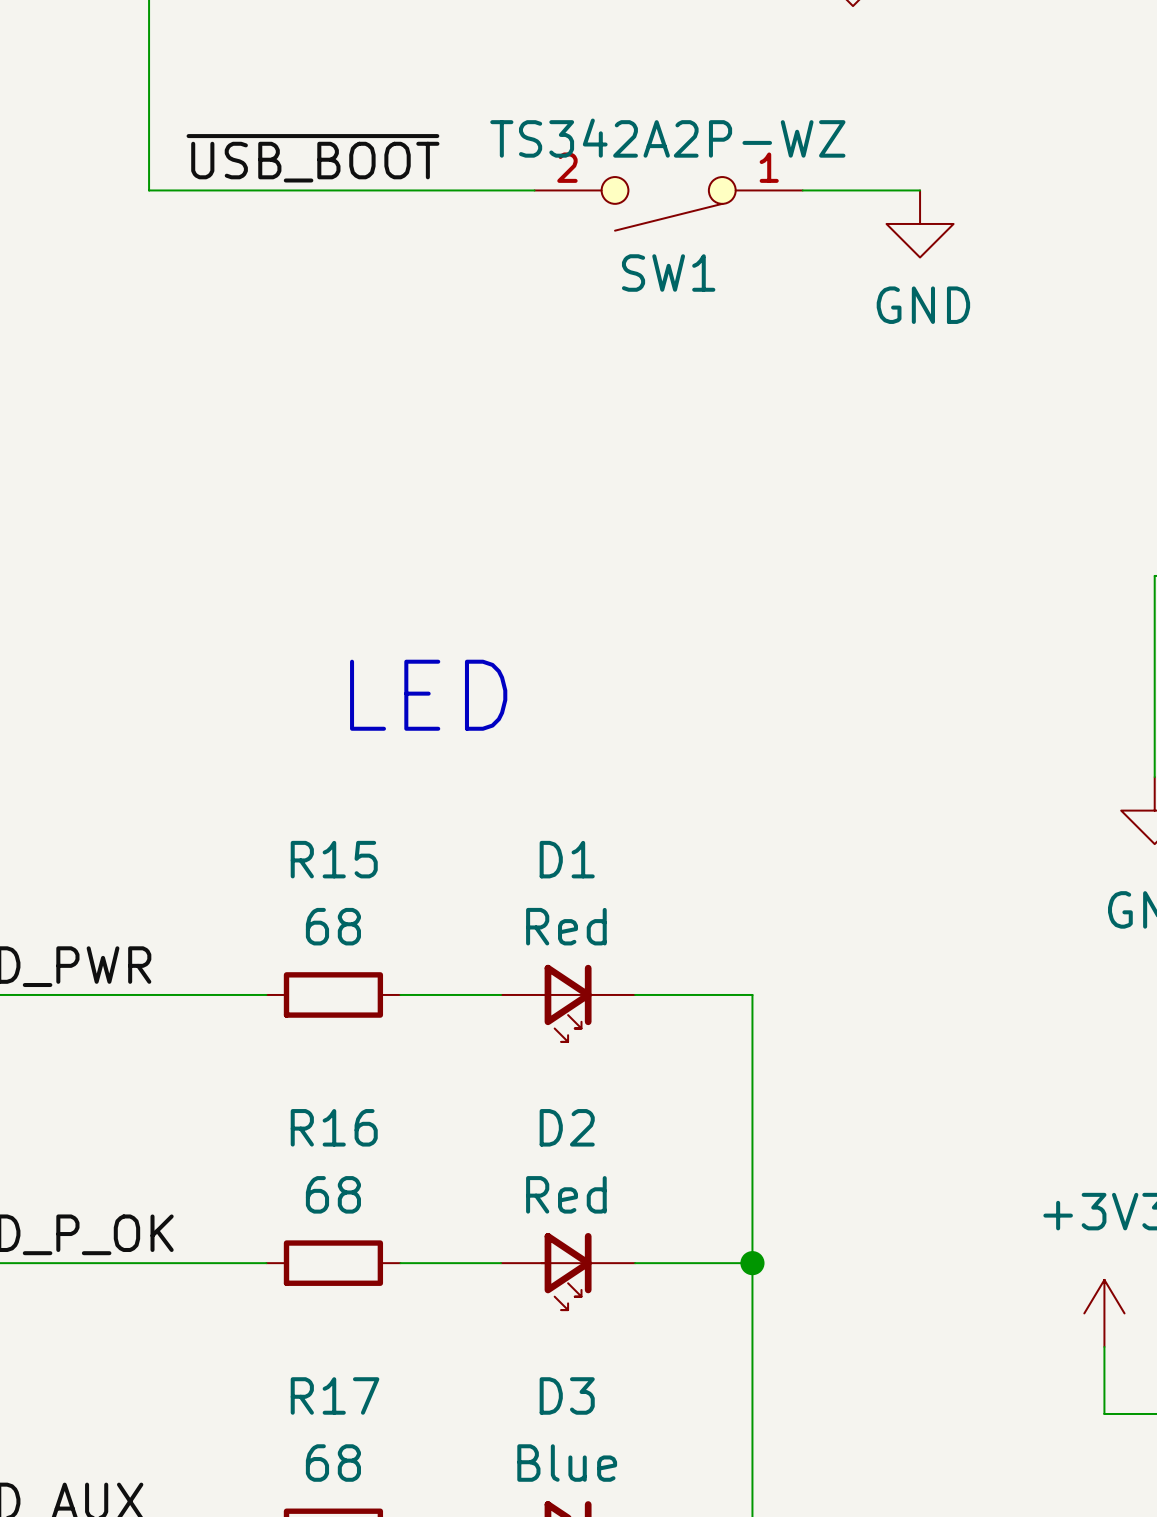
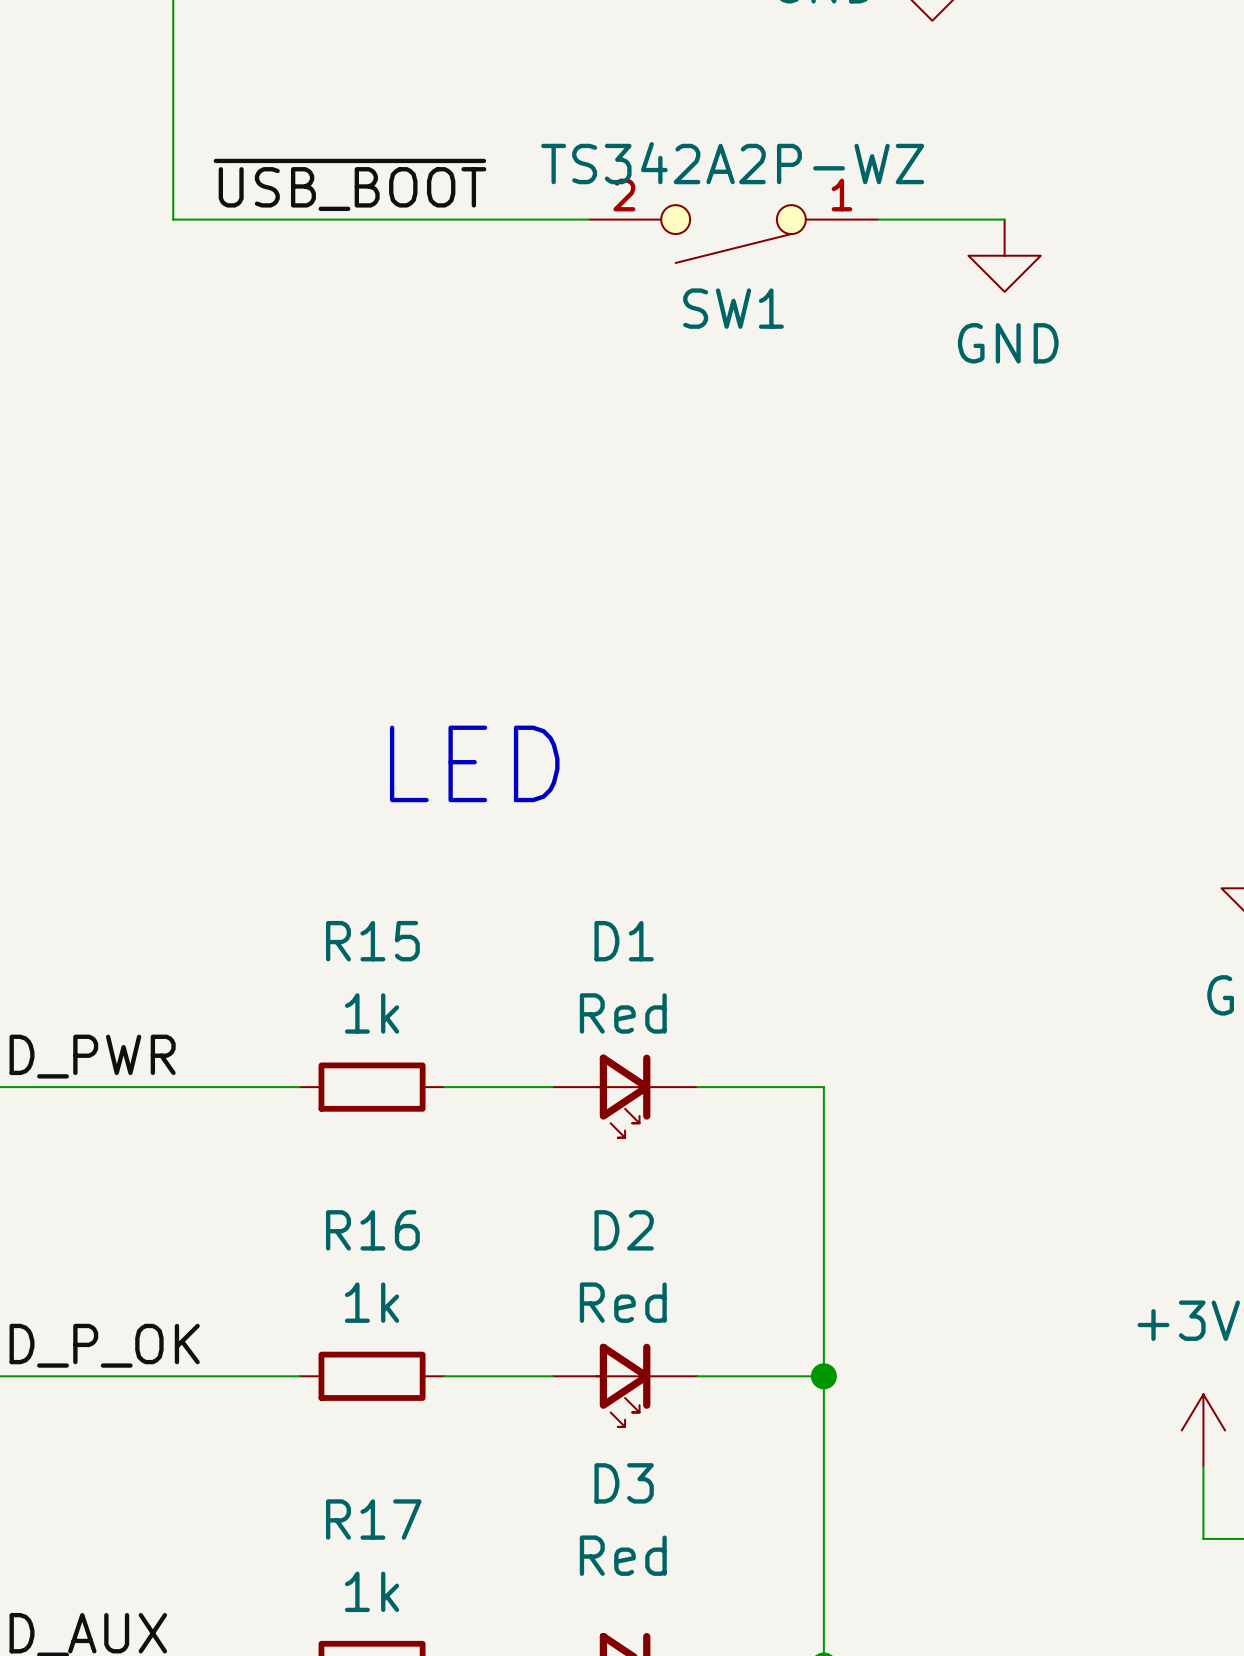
R15 value: 68 (333, 926) -> 1k (372, 1013)
R16 value: 68 (333, 1194) -> 1k (372, 1302)
D3 name position: D3 (567, 1395) -> D3 (624, 1483)
R17 value: 68 (333, 1463) -> 1k (372, 1591)
D3 value: Blue (567, 1463) -> Red (623, 1555)

